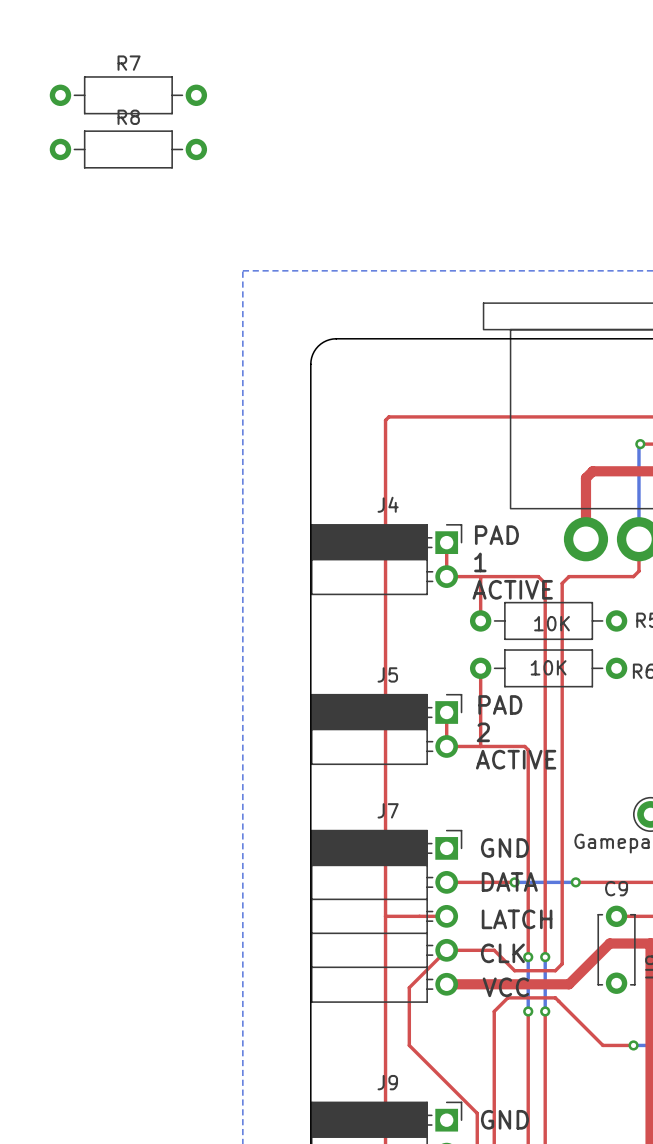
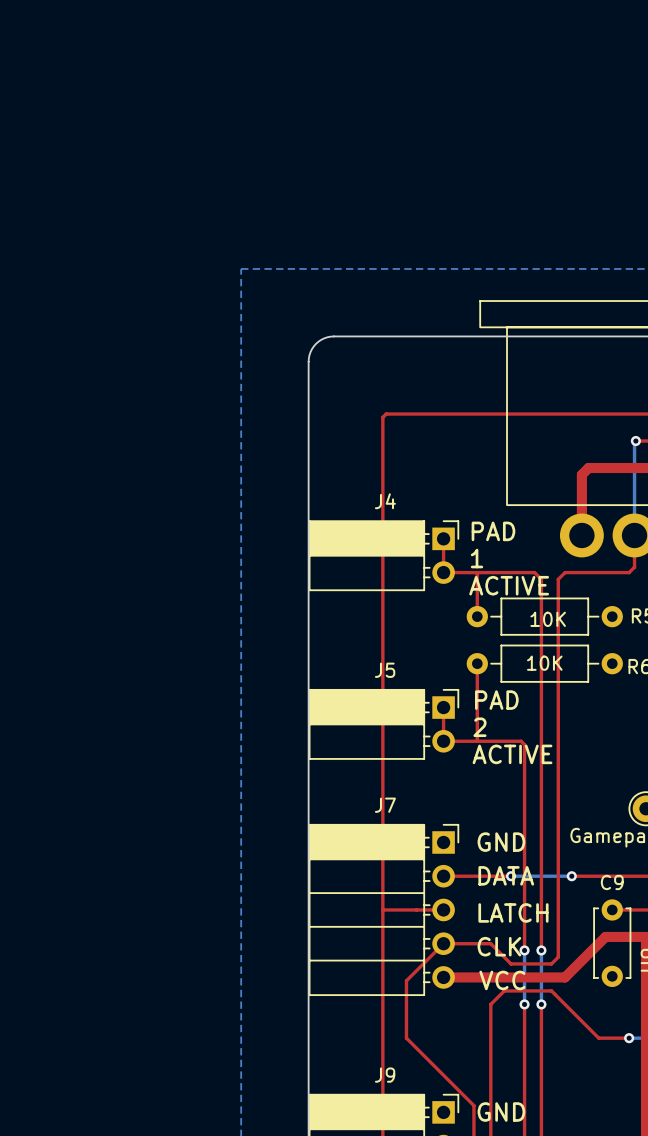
R7: (128, 95) -> none
R8: (128, 149) -> none

